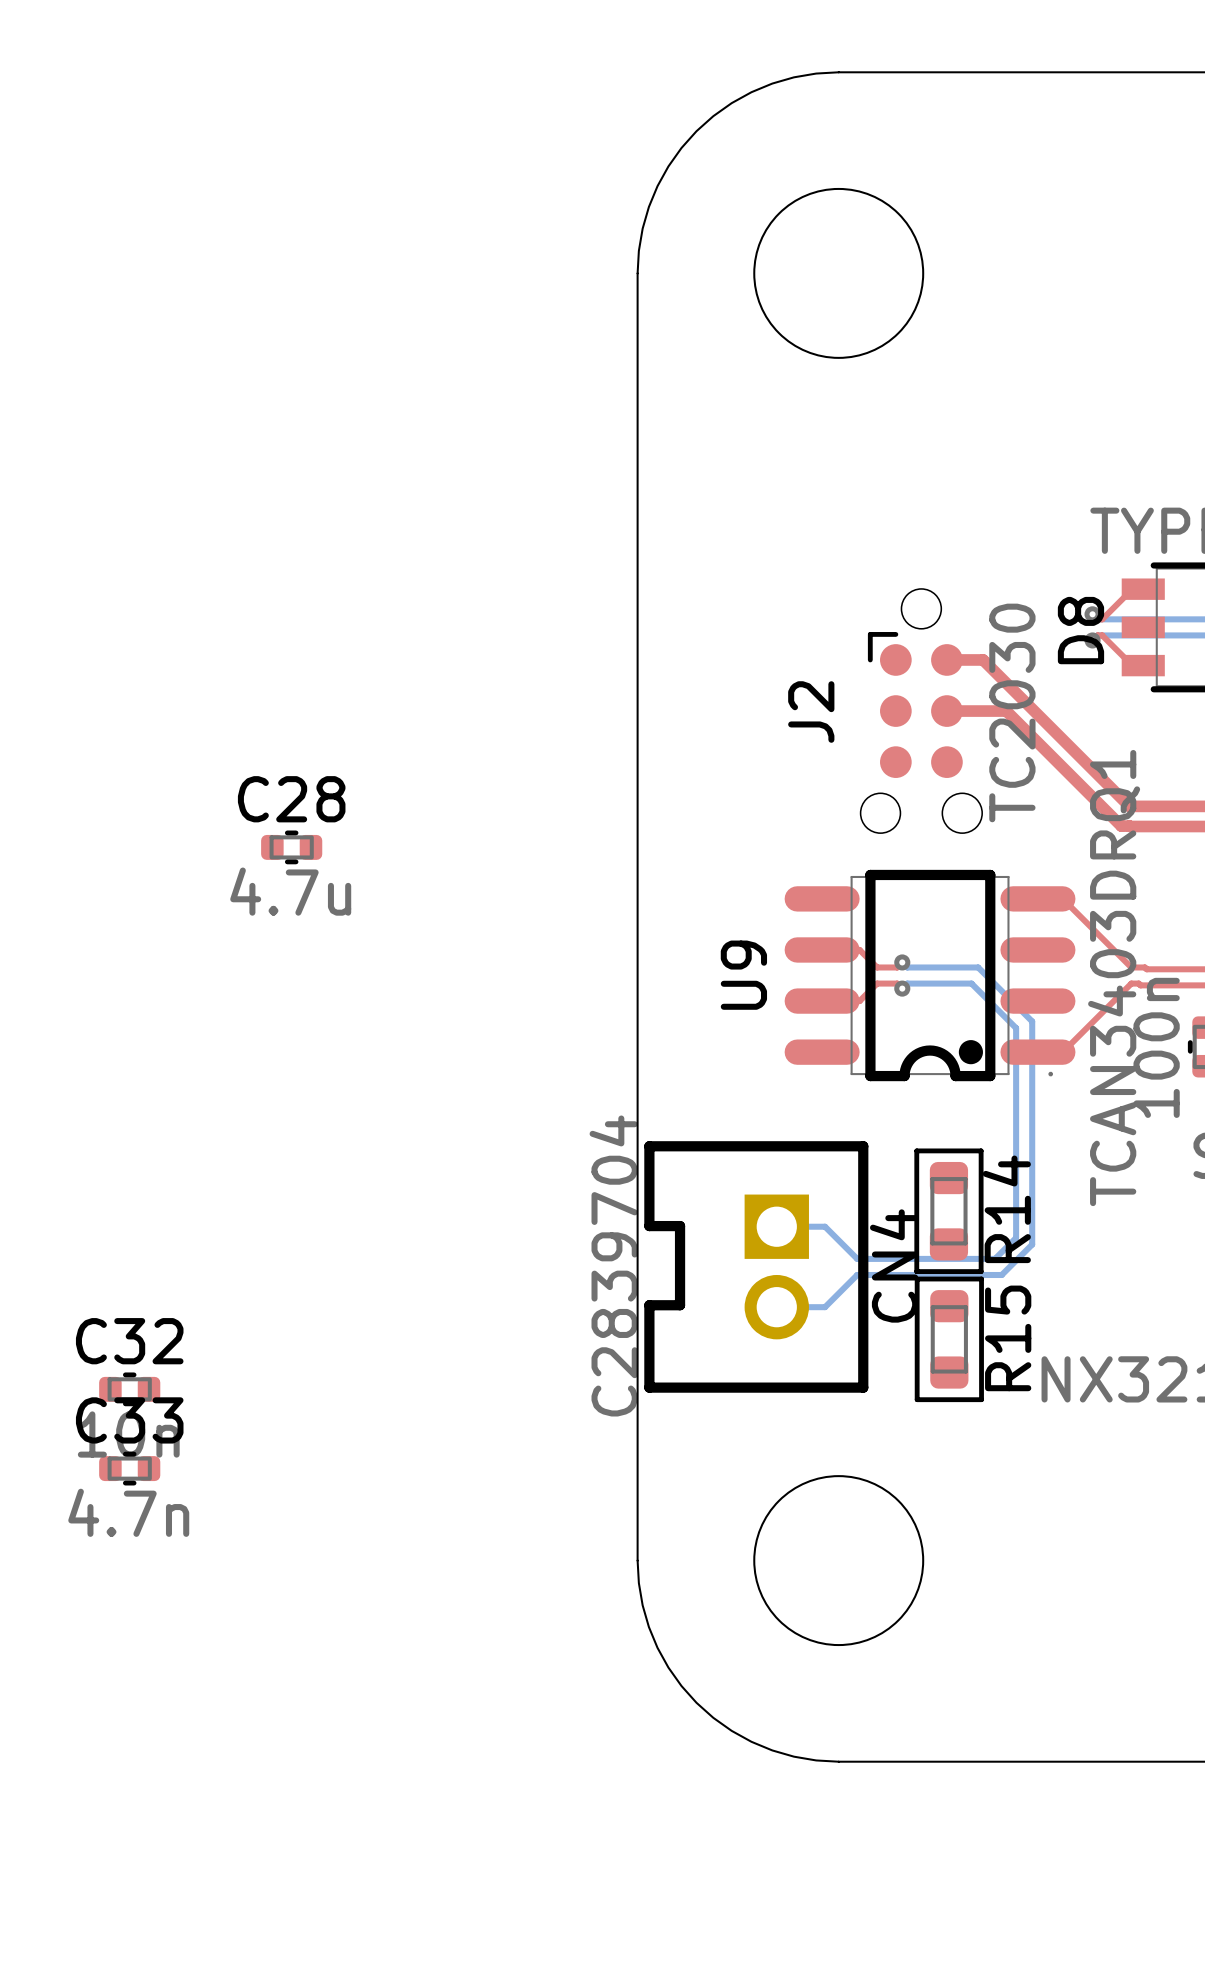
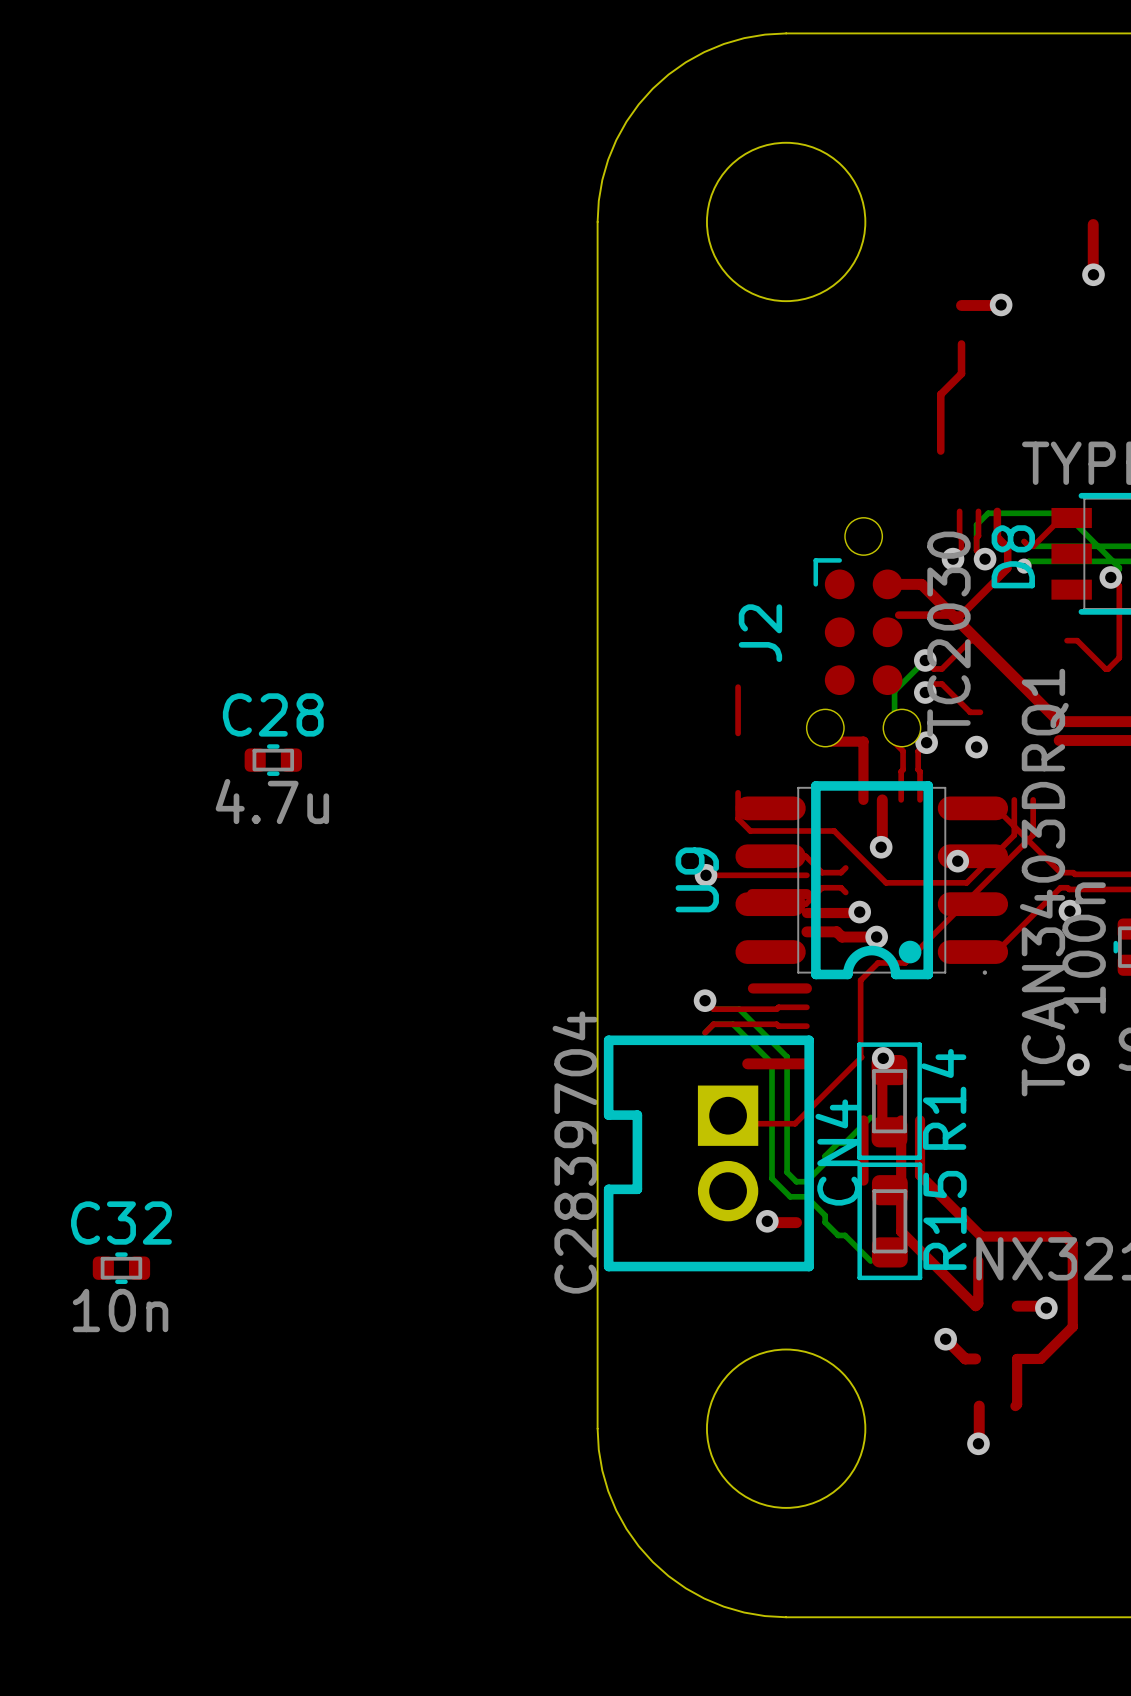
top track: none -> (1093, 224) (1093, 274)
via: none -> (1093, 274)
top track: none -> (1001, 304) (961, 305)
via: none -> (1001, 304)
top track: none -> (961, 343) (961, 373) (940, 394) (940, 451)
top track: none -> (959, 511) (961, 550) (953, 559)
top track: none -> (978, 511) (976, 550) (985, 559)
top track: none -> (997, 511) (997, 537) (1007, 547) (1007, 568) (961, 615) (898, 615)
via: (1092, 614) -> none
via: none -> (953, 559)
bottom track: none -> (985, 559) (976, 550) (976, 524) (988, 513) (1064, 513) (1119, 567) (1110, 577)
via: none -> (985, 559)
top track: (1092, 640) (1097, 635) (1102, 635) (1132, 665) (1143, 665) -> none
top track: none -> (1110, 577) (1119, 585) (1119, 657) (1108, 668) (1105, 668) (1077, 640) (1067, 640)
via: none -> (1110, 577)
top track: (946, 711) (1006, 711) (1121, 826) (1129, 826) -> none
top track: none -> (980, 640) (970, 640) (941, 668) (933, 668) (925, 660)
bottom track: none -> (925, 660) (894, 691) (894, 742)
via: none -> (925, 660)
top track: none -> (738, 687) (738, 733)
top track: none -> (925, 692) (933, 684) (941, 684) (970, 712) (980, 712)
via: none -> (925, 692)
top track: none -> (823, 741) (863, 741) (863, 799)
top track: none -> (894, 742) (903, 751) (901, 799)
top track: none -> (926, 742) (918, 751) (920, 799)
via: none -> (926, 742)
via: none -> (976, 747)
top track: none -> (738, 792) (738, 818) (750, 830) (834, 830) (886, 882) (966, 882) (1014, 835) (1014, 799)
top track: none -> (882, 799) (881, 847)
top track: none -> (1033, 799) (1033, 835) (905, 962) (878, 962) (860, 980) (861, 1057) (795, 1123) (740, 1123)
via: none -> (881, 847)
via: none -> (957, 861)
bottom track: (902, 962) (907, 967) (978, 967) (1032, 1021) (1032, 1244) (1001, 1274) (857, 1274) (825, 1307) (776, 1307) -> none
via: (902, 962) -> none
top track: none -> (706, 875) (806, 875)
via: none -> (706, 875)
bottom track: (902, 988) (907, 983) (971, 983) (1016, 1028) (1016, 1237) (995, 1258) (857, 1258) (825, 1226) (776, 1226) -> none
via: (902, 988) -> none
top track: none -> (752, 894) (806, 894)
via: none -> (1069, 911)
top track: none -> (859, 912) (806, 913)
via: none -> (859, 912)
top track: none -> (806, 931) (836, 931) (841, 937) (876, 937)
via: none -> (876, 937)
top track: none -> (752, 988) (806, 988)
top track: none -> (705, 1000) (713, 1009) (806, 1007)
bottom track: none -> (705, 1000) (713, 1009) (739, 1009) (787, 1056) (787, 1172) (796, 1181) (806, 1181) (825, 1162) (825, 1156) (838, 1143) (845, 1143) (870, 1117)
via: none -> (705, 1000)
top track: none -> (806, 1026) (713, 1024) (705, 1032)
bottom track: none -> (705, 1032) (713, 1024) (733, 1024) (772, 1063) (772, 1178) (790, 1196) (806, 1196) (825, 1215) (825, 1222) (838, 1235) (845, 1235) (870, 1261)
top track: none -> (883, 1058) (882, 1120)
via: none -> (883, 1058)
top track: none -> (747, 1063) (806, 1063)
via: none -> (1078, 1064)
top track: none -> (863, 1120) (863, 1180)
top track: none -> (901, 1120) (901, 1231) (975, 1306) (978, 1303) (978, 1260)
top track: none -> (920, 1120) (920, 1175) (981, 1236) (1065, 1236) (1072, 1243) (1072, 1326) (1040, 1358) (1017, 1358) (1017, 1404) (1015, 1406)
top track: none -> (767, 1221) (796, 1222)
via: none -> (767, 1221)
top track: none -> (1017, 1306) (1044, 1306) (1046, 1308)
via: none -> (1046, 1308)
top track: none -> (945, 1339) (965, 1358) (975, 1358)
via: none -> (945, 1339)
C33: 4.7n (129, 1468) -> none
top track: none -> (979, 1406) (978, 1443)
via: none -> (978, 1443)

